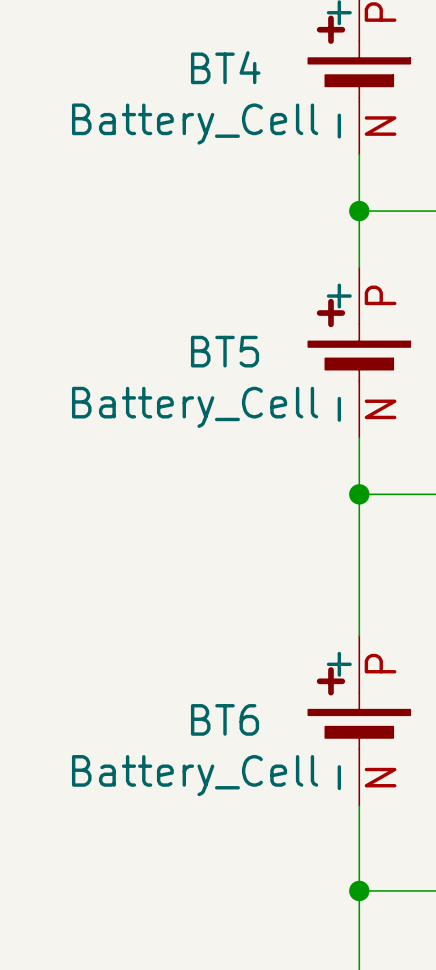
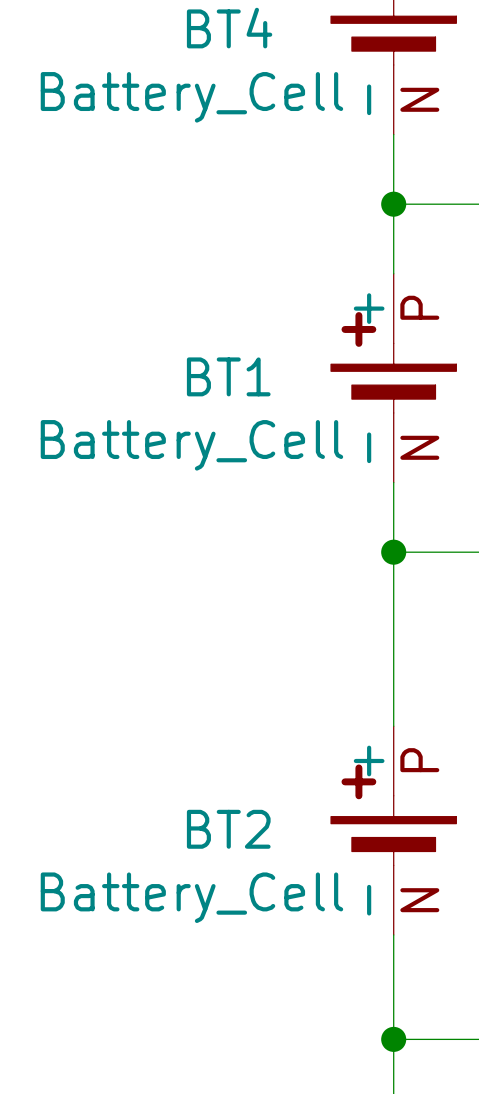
BT5 name: BT5 (225, 351) -> BT1 (228, 376)
BT6 name: BT6 (225, 719) -> BT2 (228, 829)

